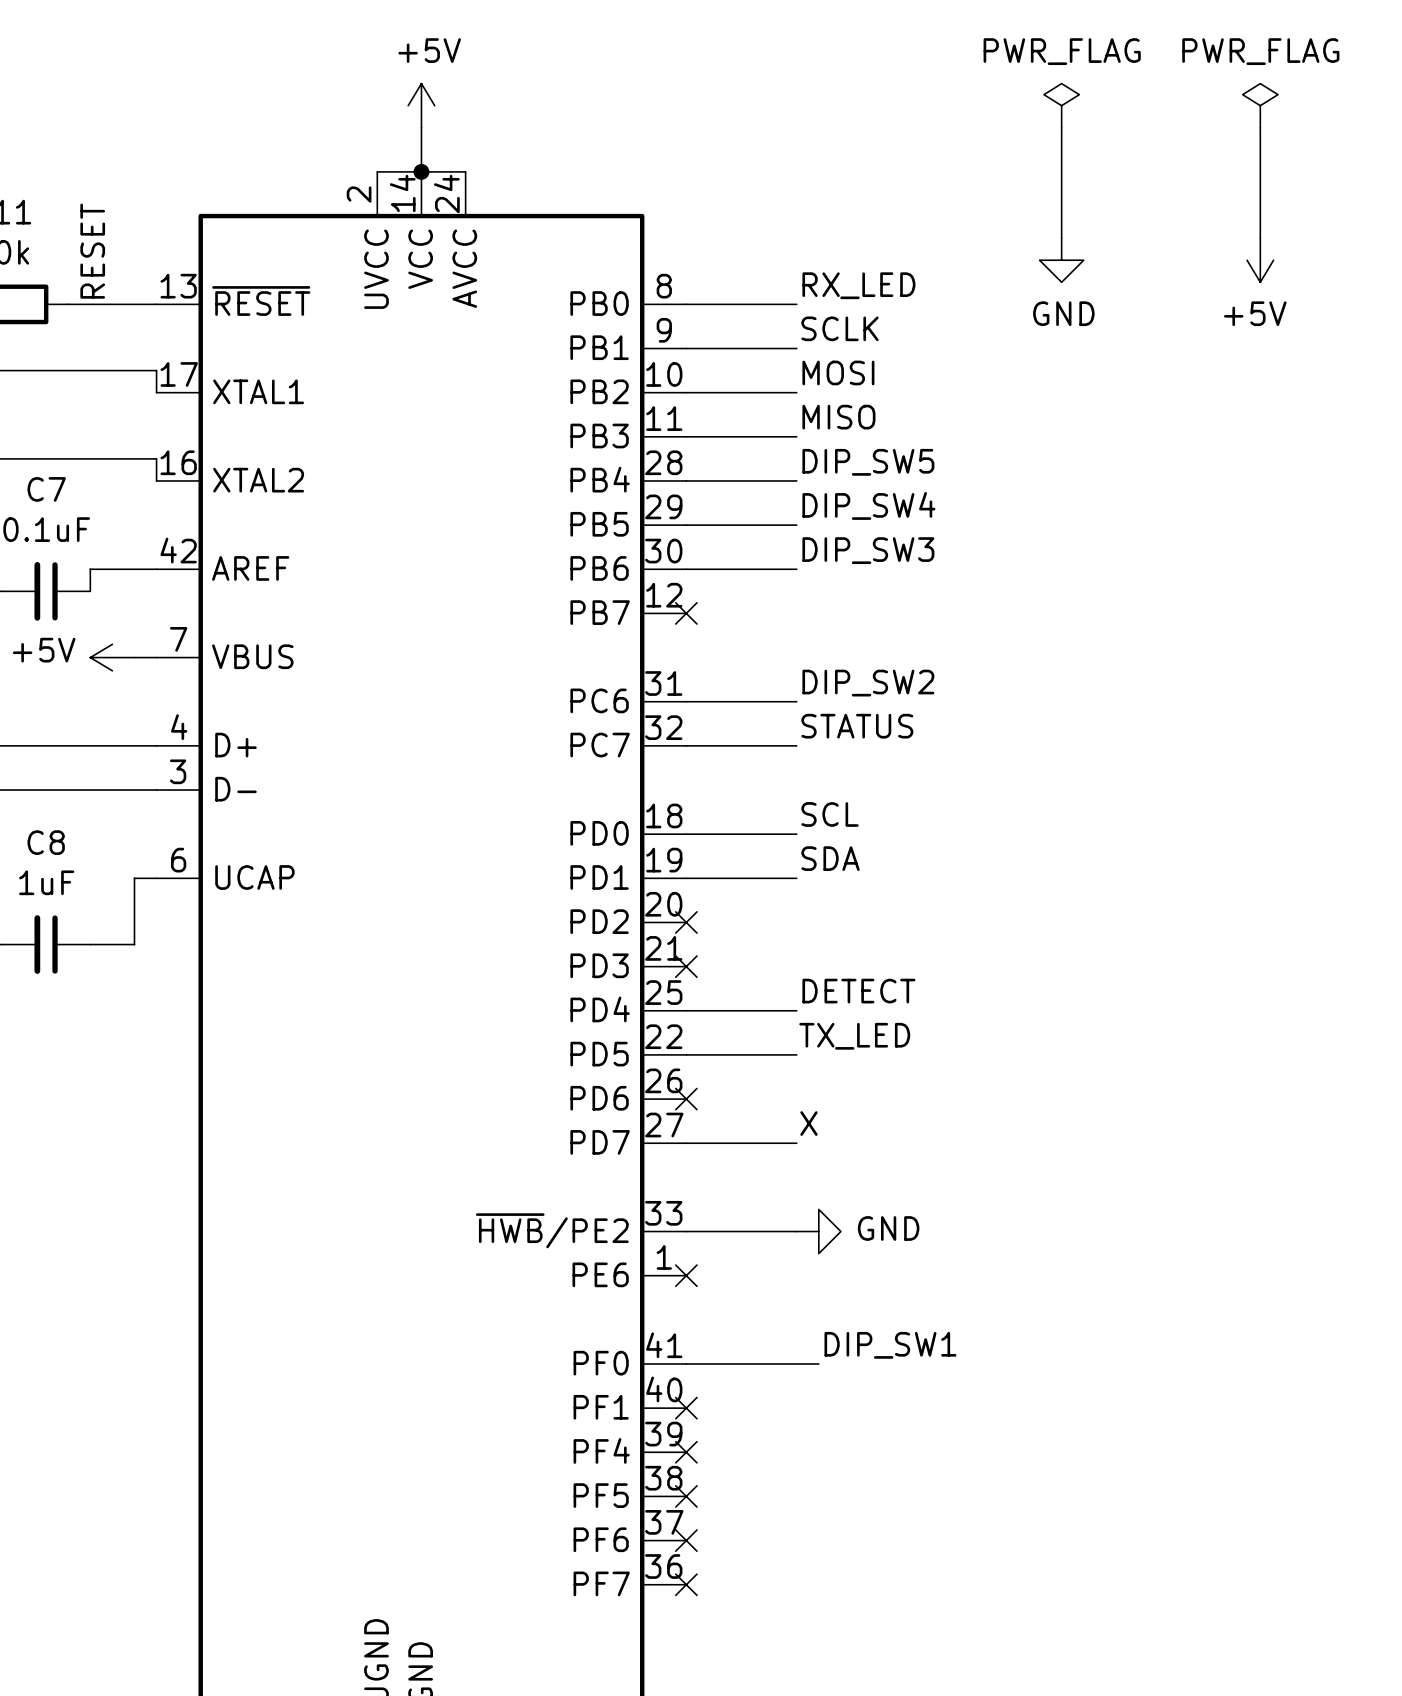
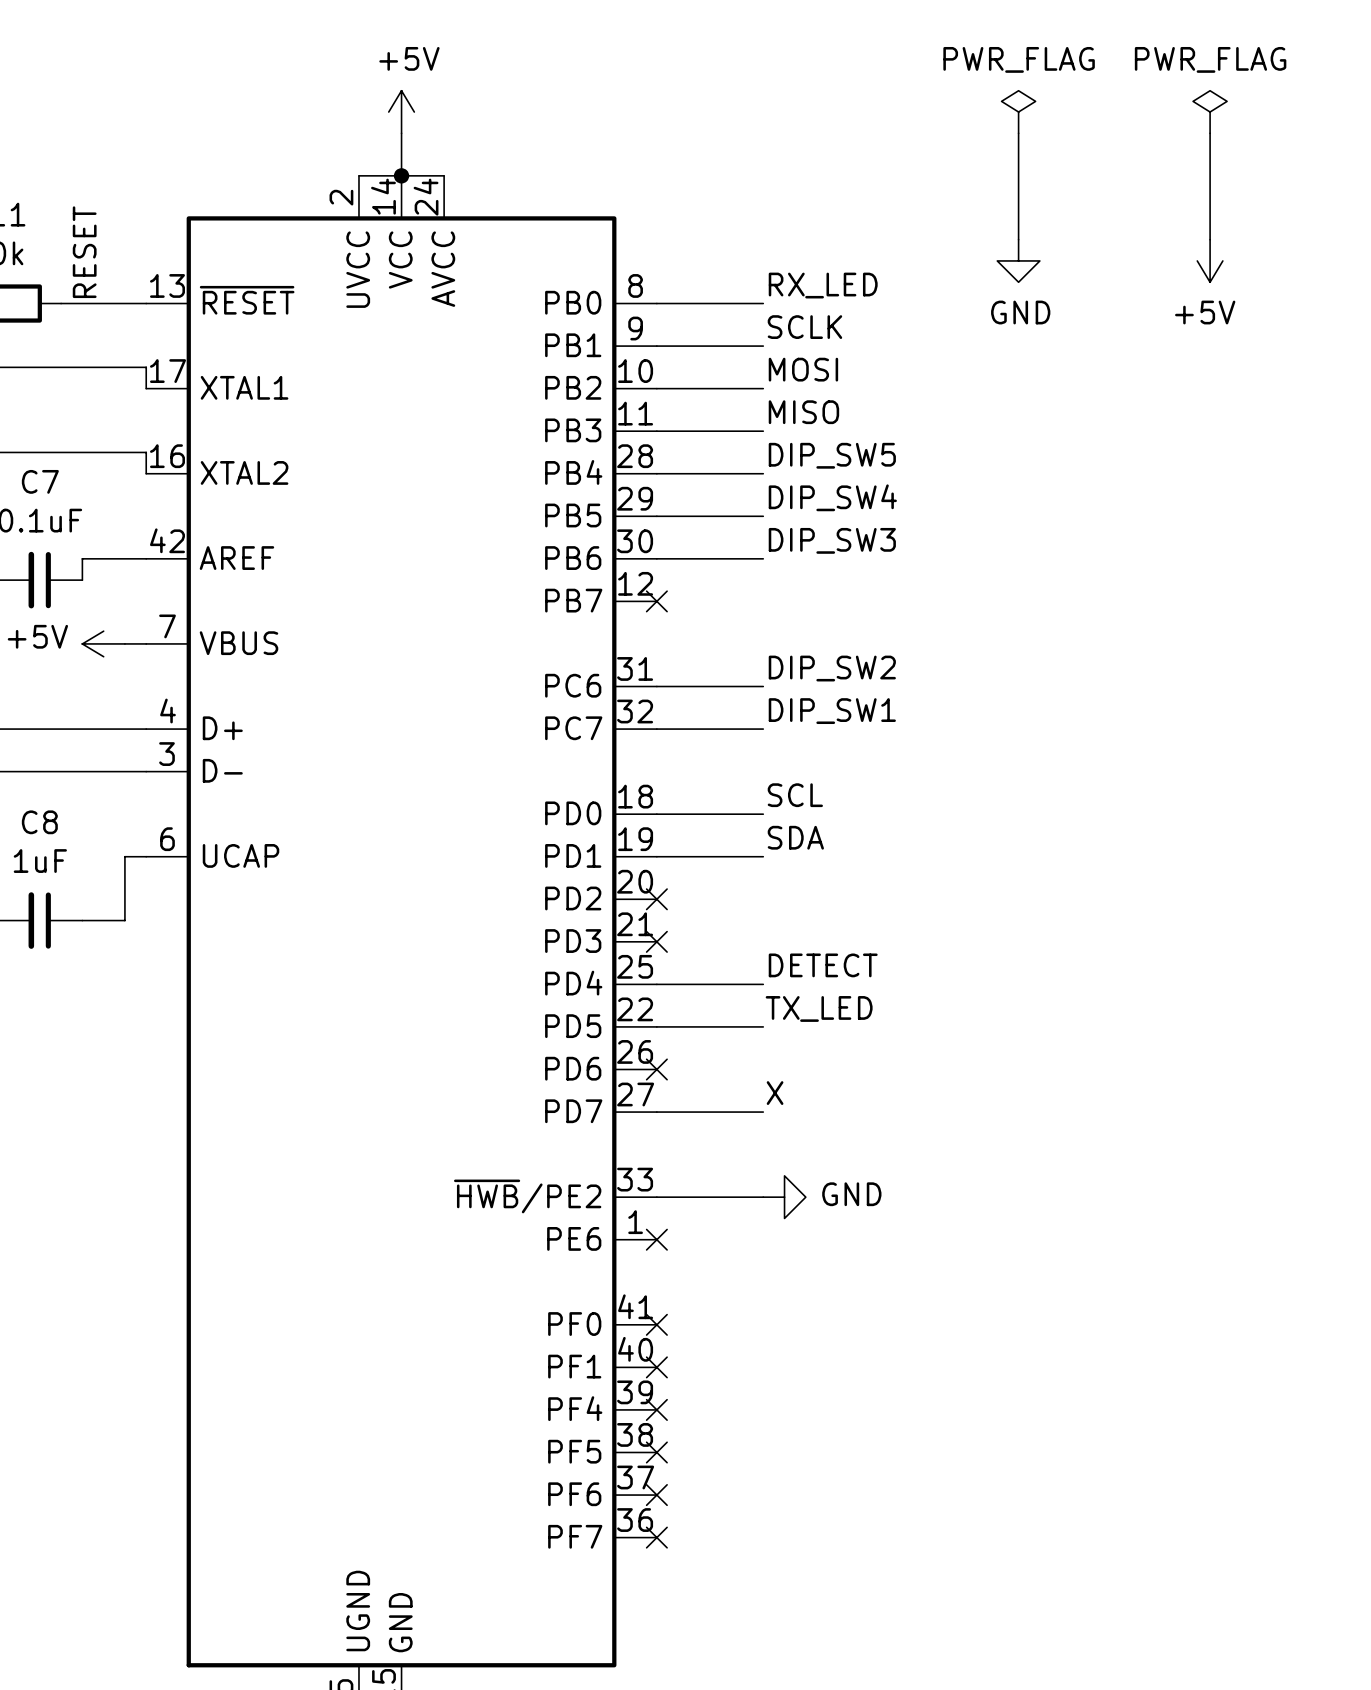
label: STATUS (857, 726) -> DIP_SW1 (832, 711)
label: DIP_SW1 (890, 1345) -> none
wire: (686, 1363) (818, 1363) -> none
no-connect mark: none -> (656, 1324)

